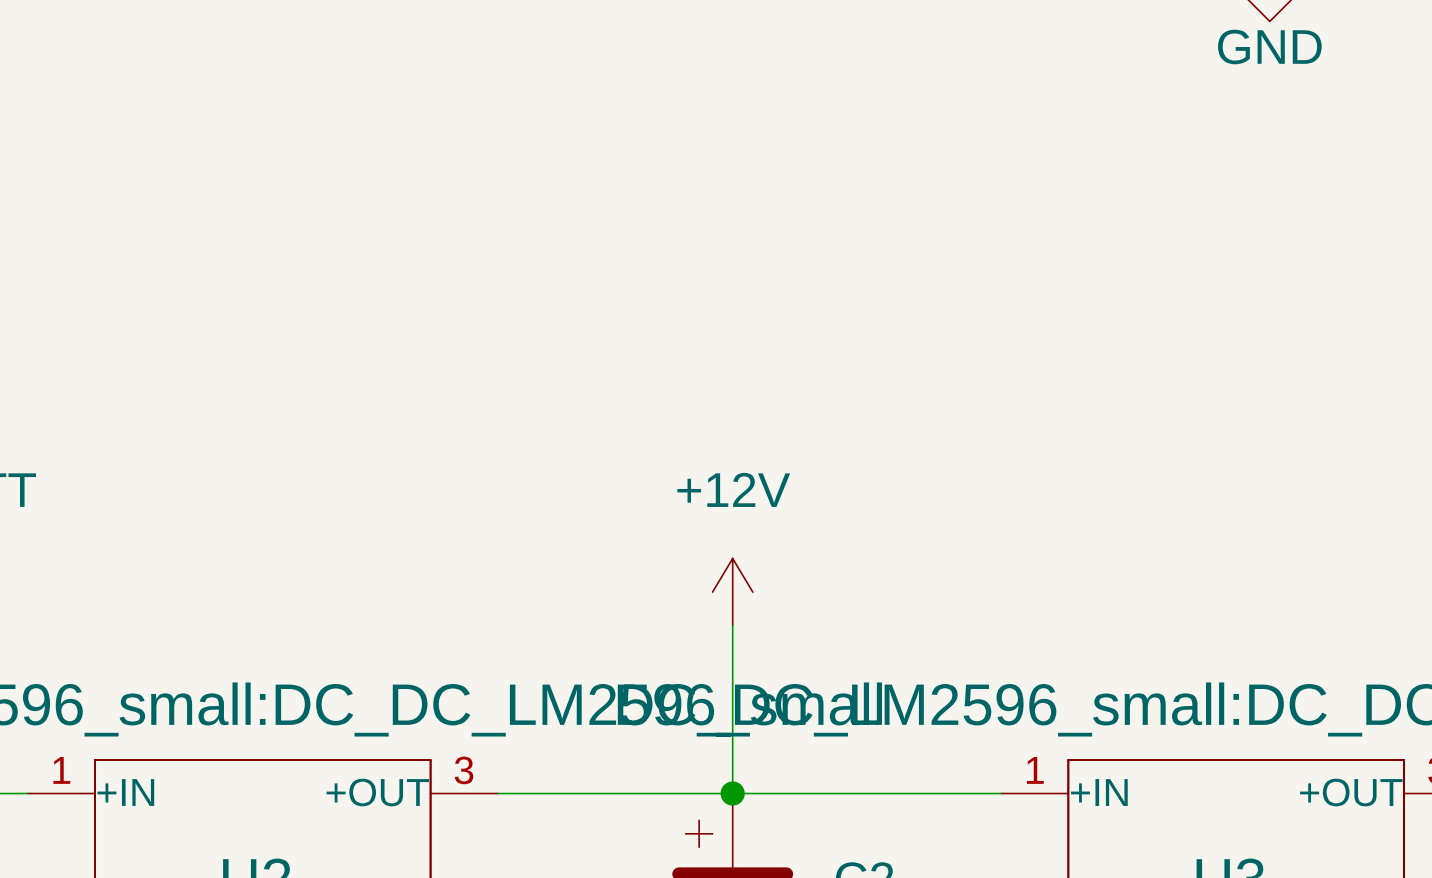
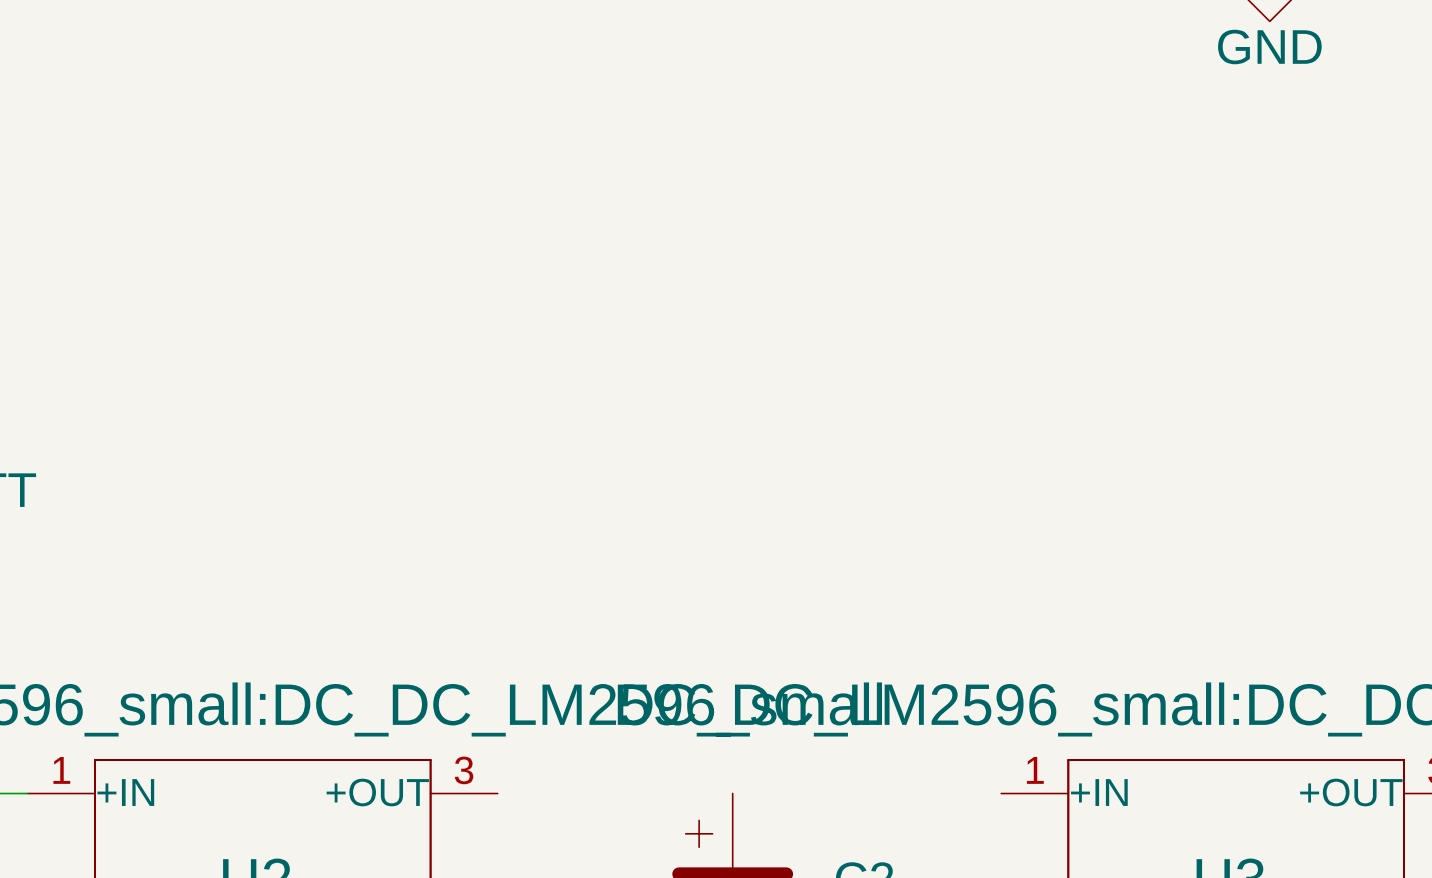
power symbol: +12V (732, 592) -> none
wire: (732, 625) (732, 793) -> none
wire: (497, 793) (1001, 793) -> none
junction: (732, 793) -> none

